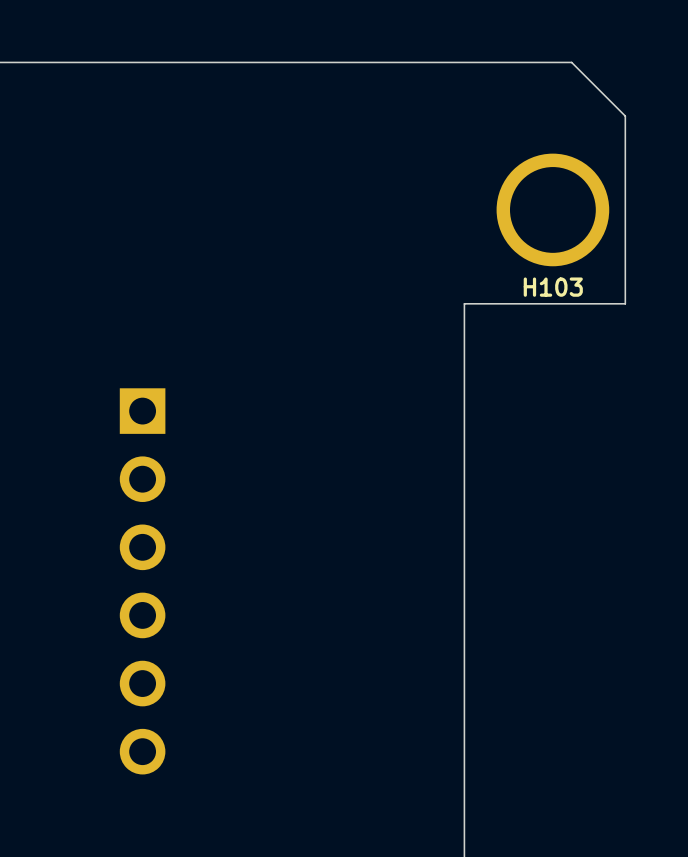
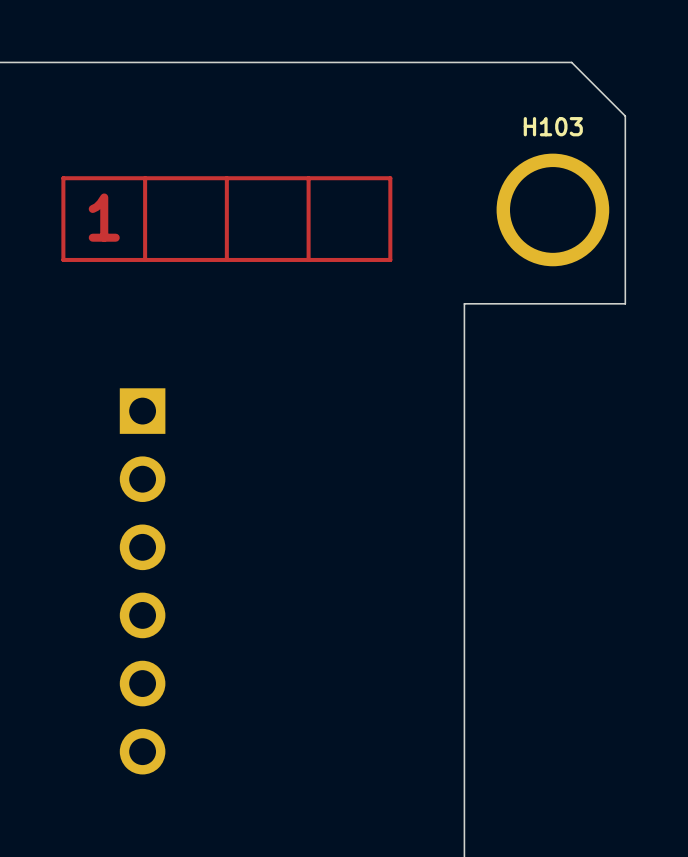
track: none -> (63, 178) (63, 259) (390, 259) (390, 178) (63, 178)
track: none -> (145, 178) (145, 259)
track: none -> (226, 178) (226, 259)
track: none -> (308, 178) (308, 259)
text: none -> 1 (104, 217)
H103 name position: H103 (553, 287) -> H103 (553, 126)

